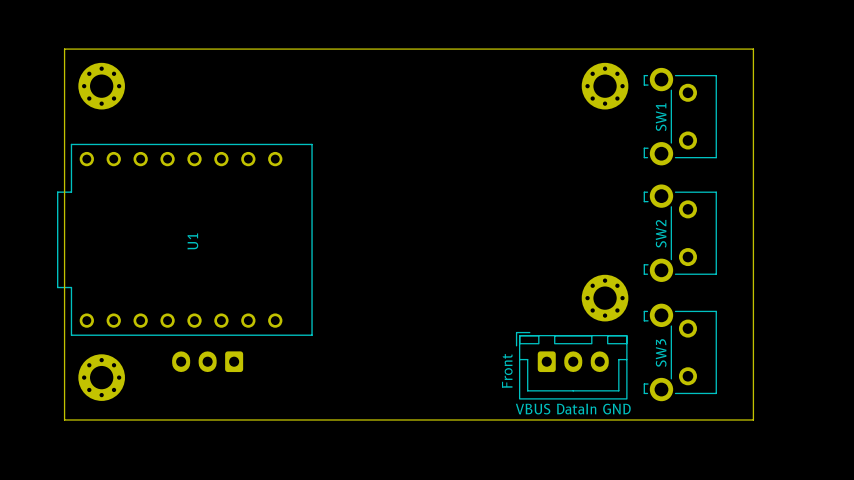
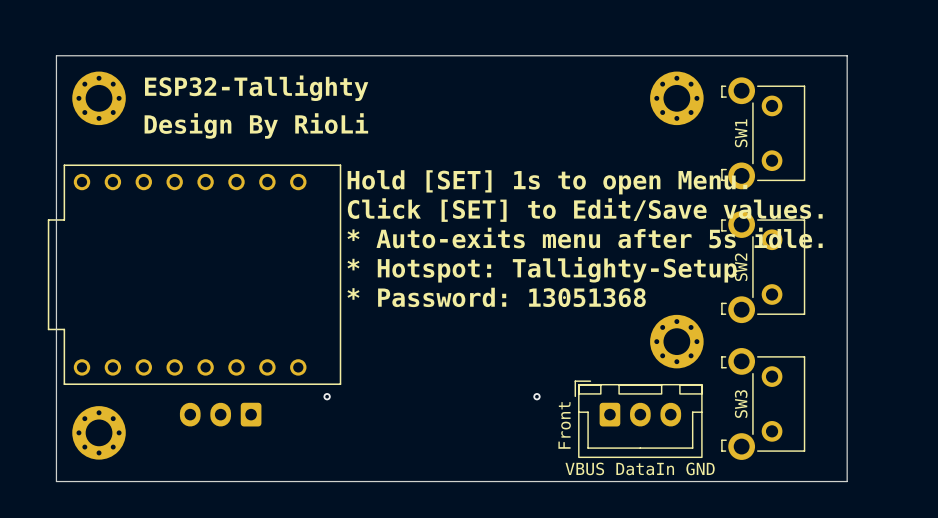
text: none -> ESP32-Tallighty (256, 88)
text: none -> Design By RioLi (256, 125)
text: none -> Hold [SET] 1s to open Menu. (547, 182)
text: none -> Click [SET] to Edit/Save values. (585, 210)
text: none -> * Auto-exits menu after 5s idle. (585, 237)
text: none -> * Hotspot: Tallighty-Setup (542, 269)
U1 name: U1 (192, 241) -> none
text: none -> * Password: 13051368 (496, 297)
via: none -> (327, 396)
via: none -> (536, 396)

